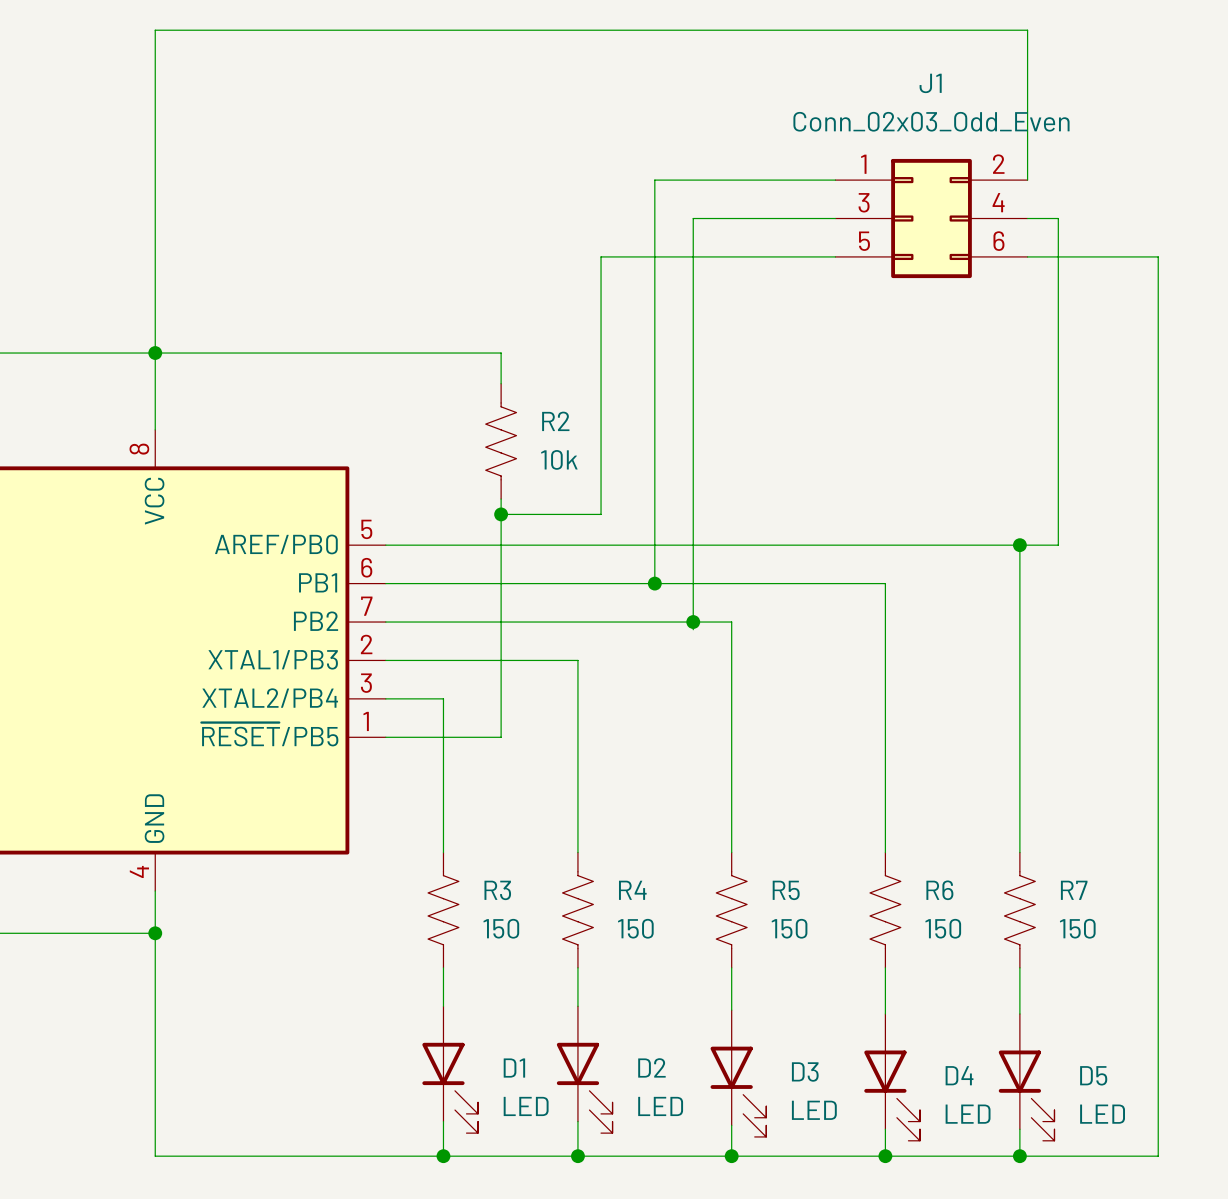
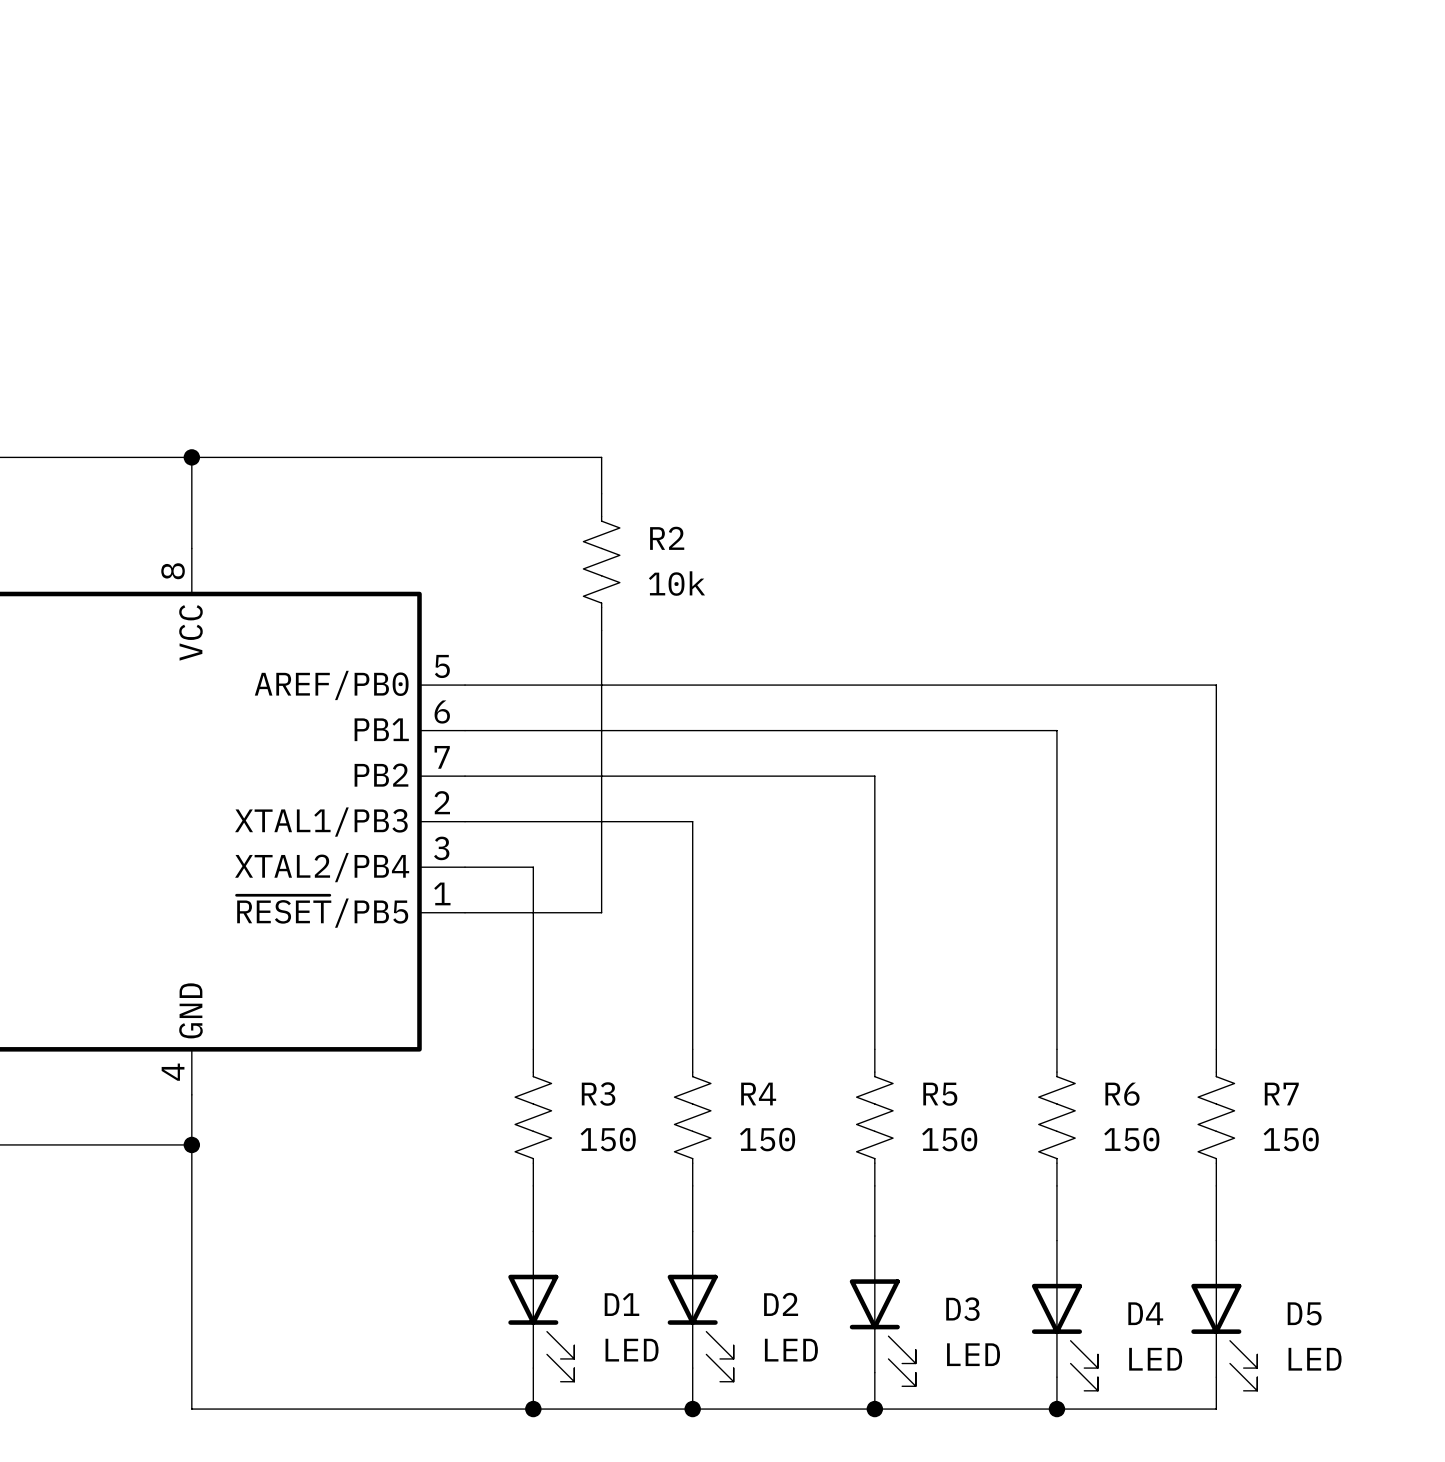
wire: (835, 180) (654, 180) (654, 583) -> none
wire: (1027, 180) (1027, 30) (155, 30) (155, 353) -> none
wire: (835, 218) (693, 218) (693, 629) -> none
J1: Conn_02x03_Odd_Even (931, 218) -> none
wire: (1027, 218) (1058, 218) (1058, 545) (1019, 545) -> none
wire: (835, 256) (601, 256) (601, 514) (501, 514) -> none
wire: (1027, 256) (1158, 256) (1158, 1156) (1019, 1156) -> none
junction: (501, 514) -> none
junction: (1019, 545) -> none
junction: (654, 583) -> none
junction: (693, 622) -> none
junction: (1019, 1156) -> none

